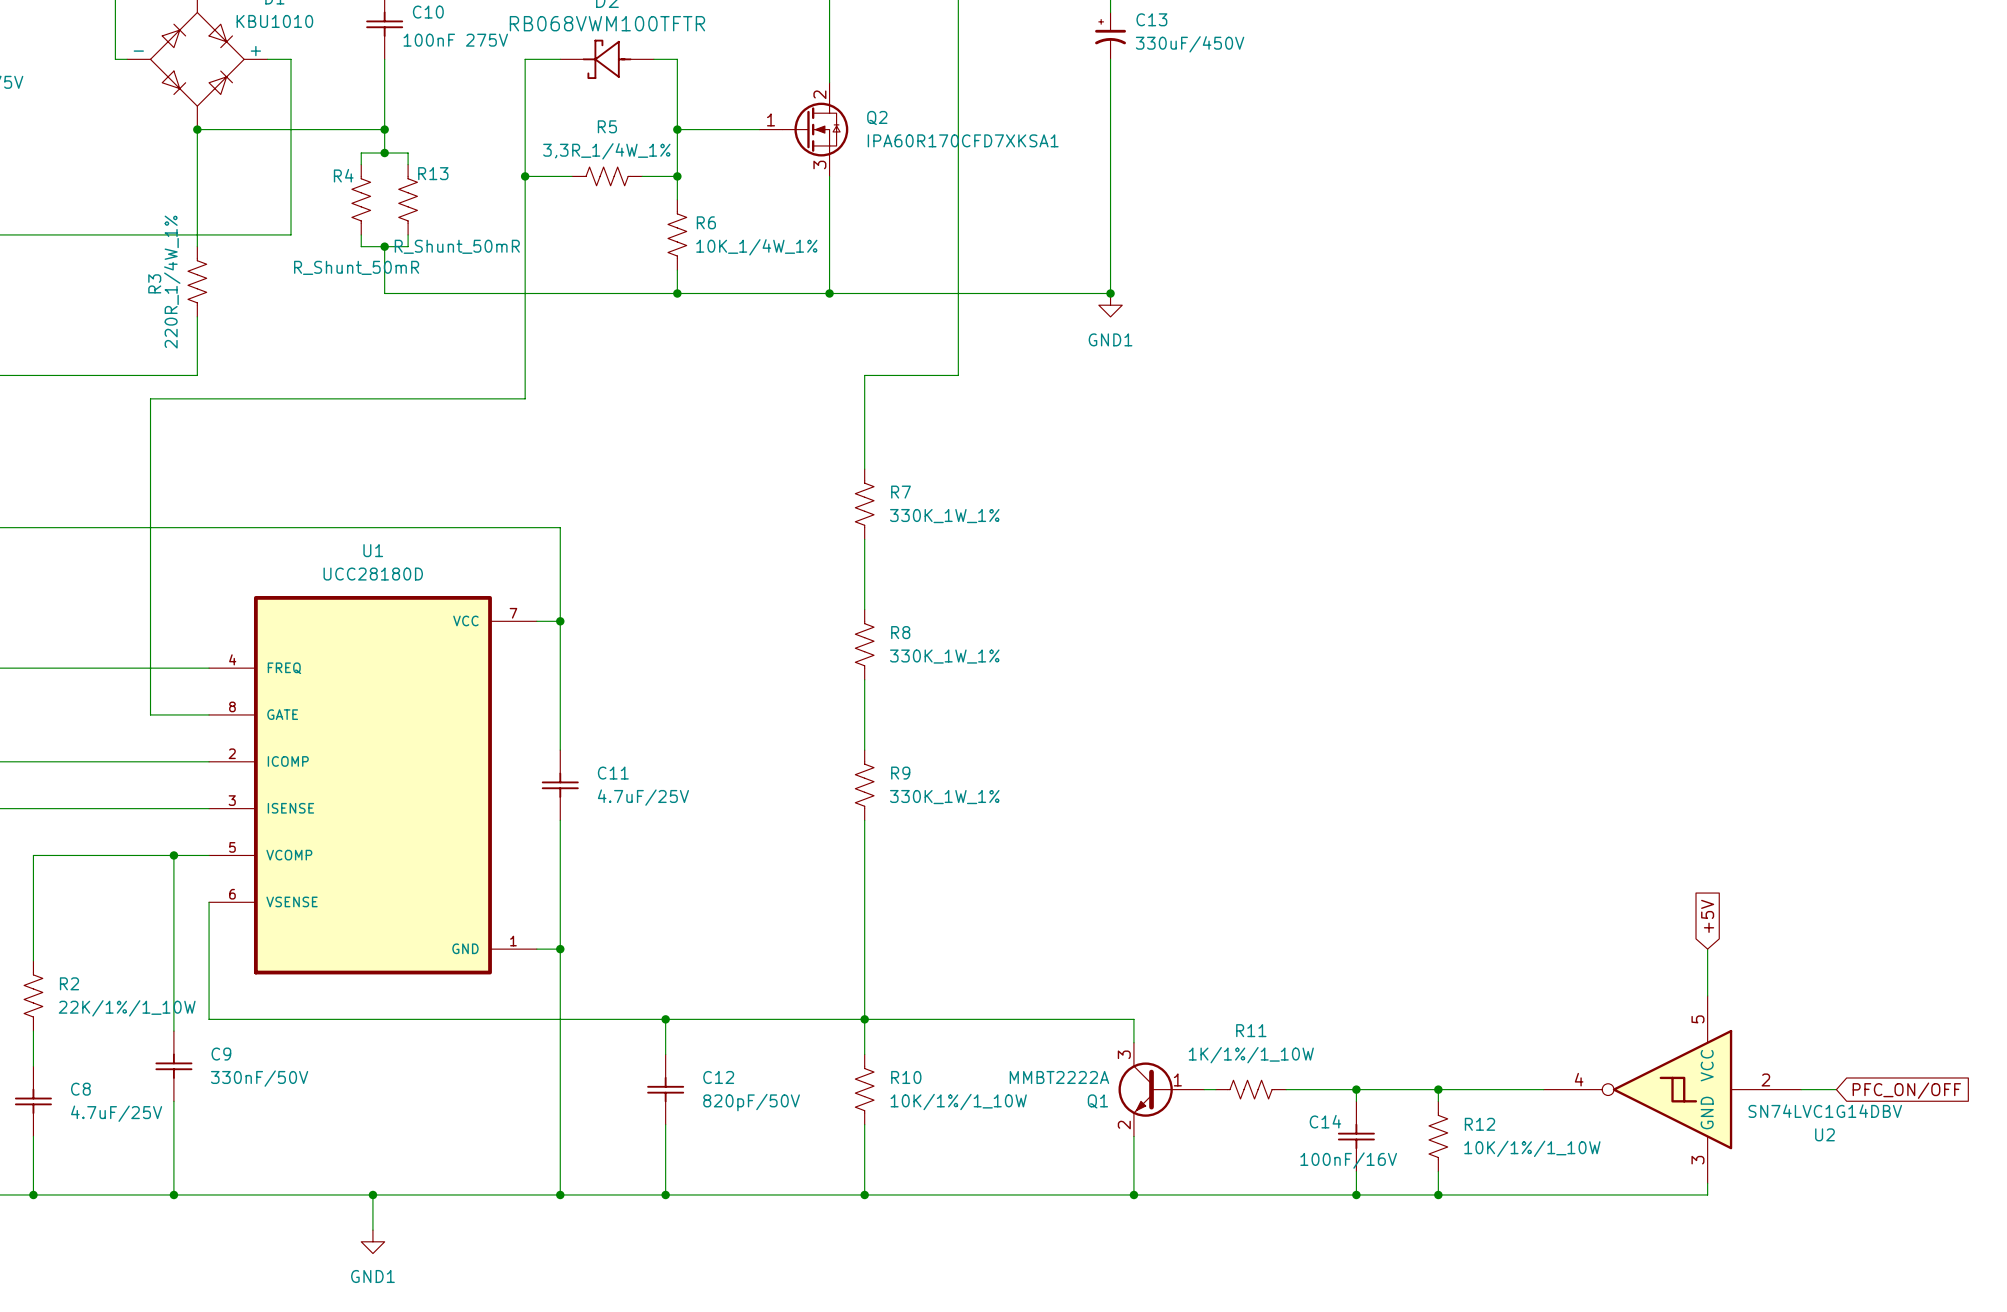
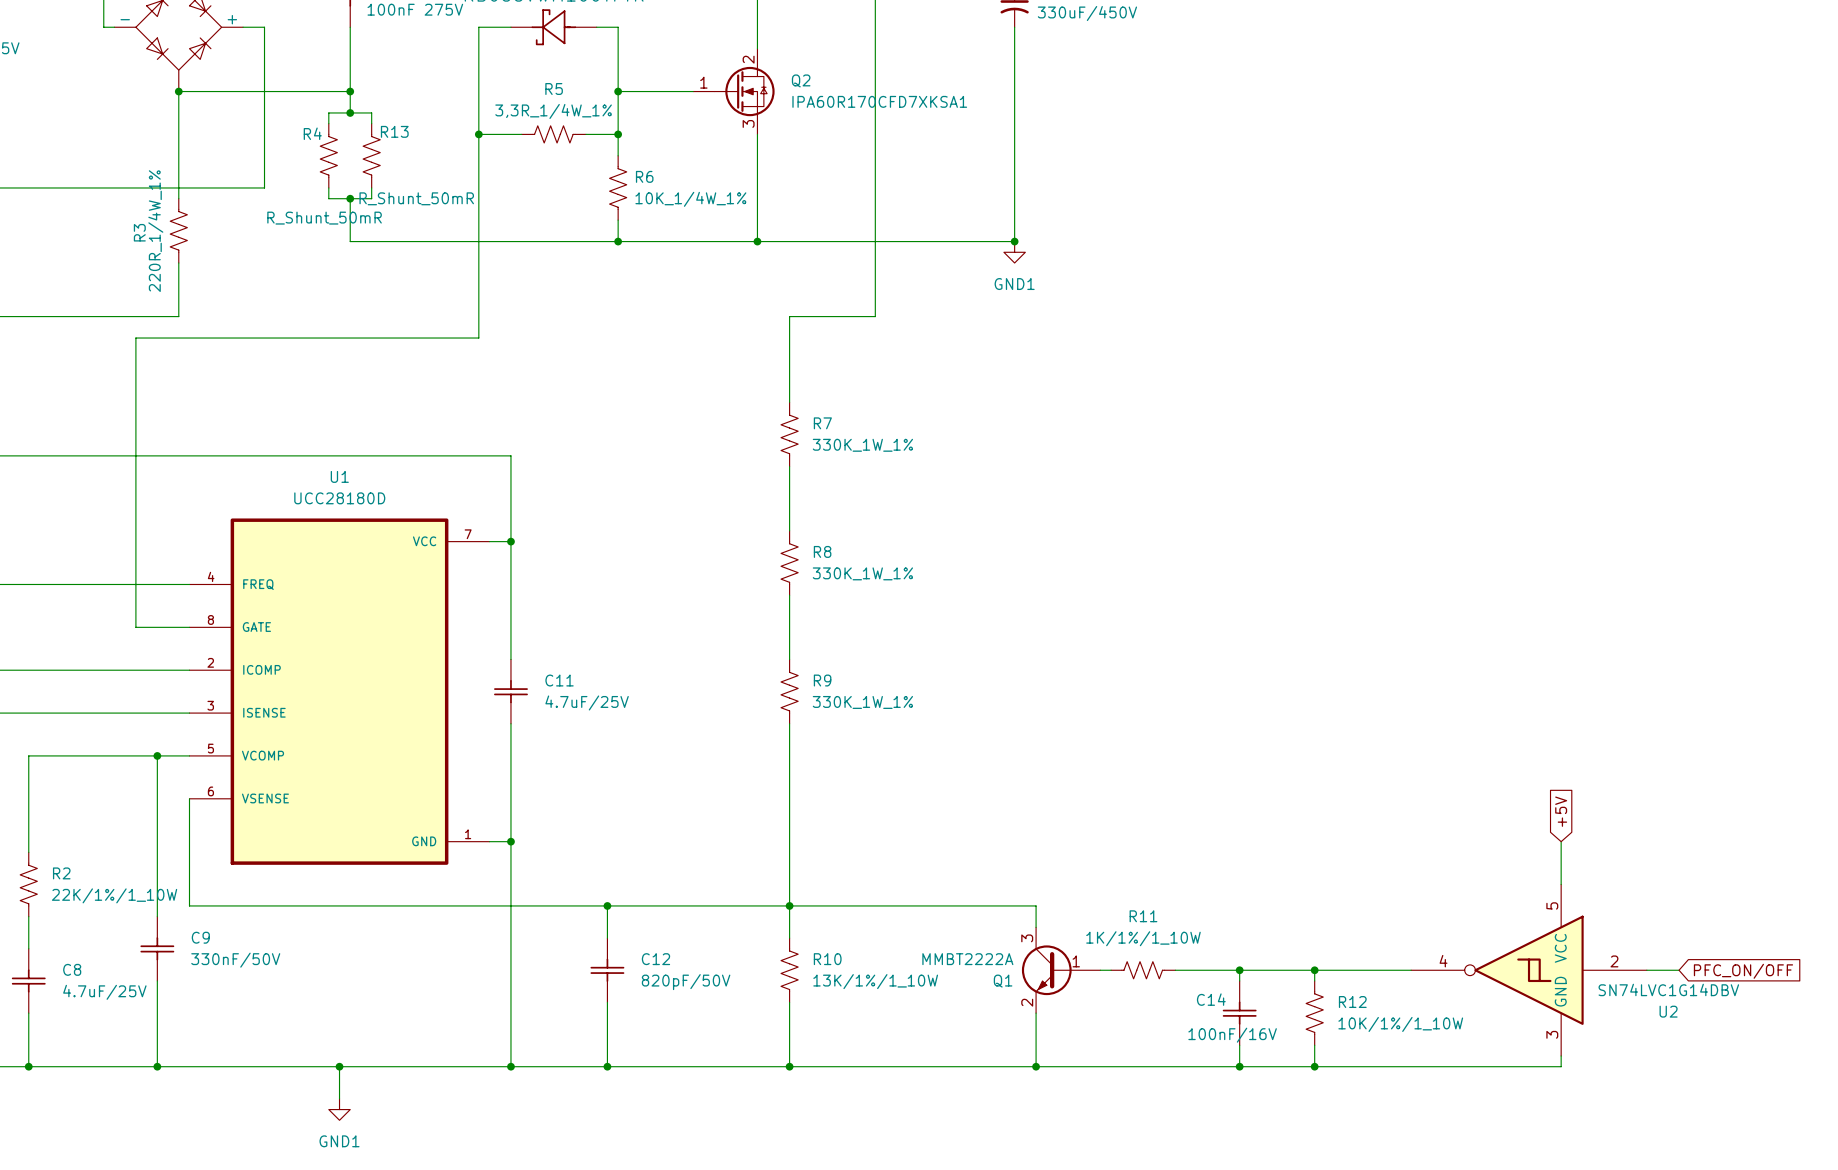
R10 value: 10K/1%/1_10W (958, 1102) -> 13K/1%/1_10W (875, 981)

